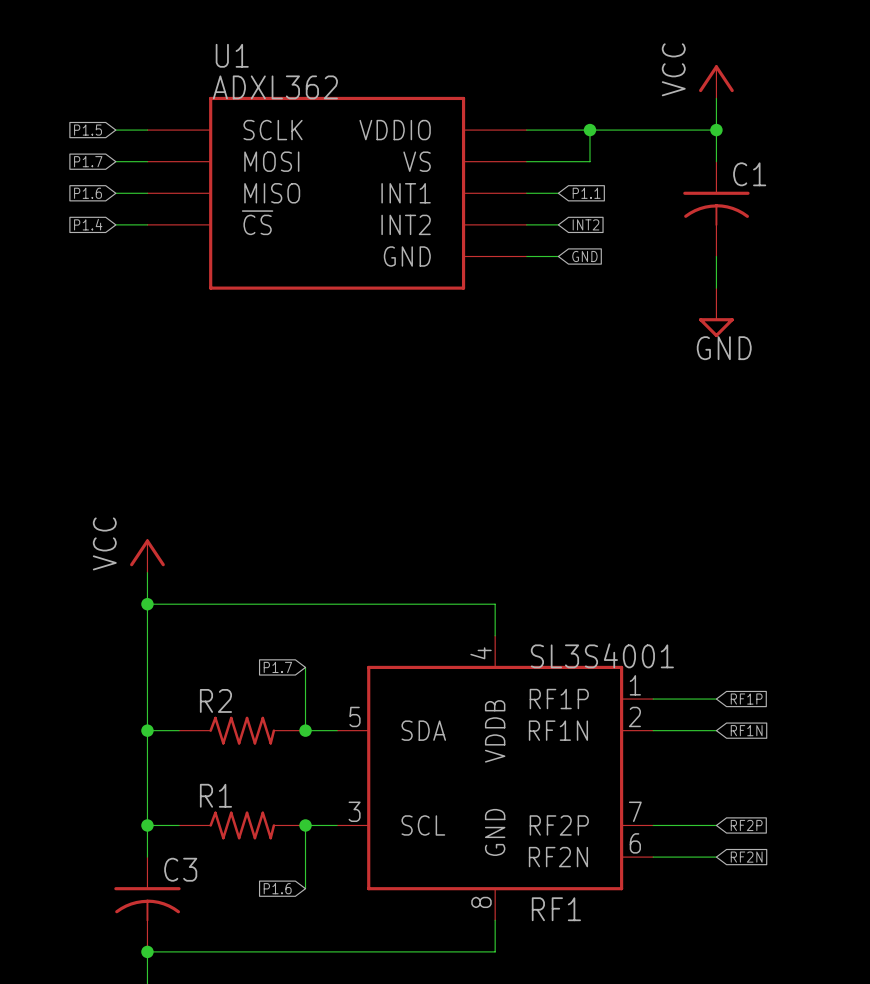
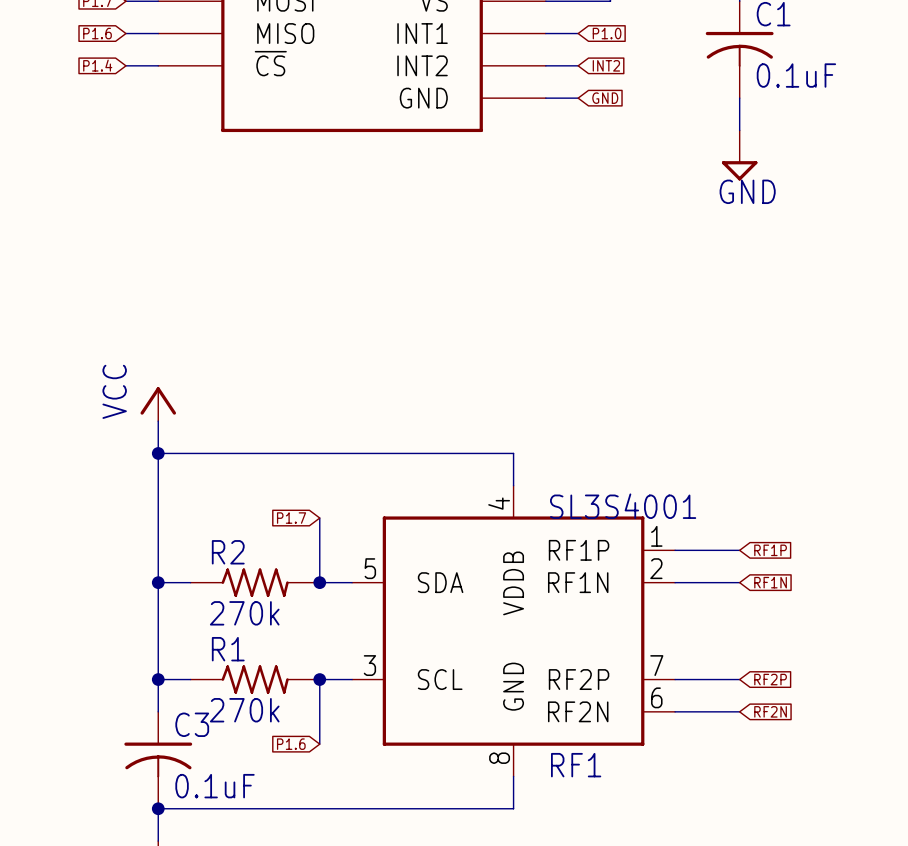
global label: P1.1 (586, 193) -> P1.0 (607, 33)
C1 value: none -> 0.1uF (796, 75)
R2 value: none -> 270k (244, 613)
R1 value: none -> 270k (244, 710)
C3 value: none -> 0.1uF (215, 786)

